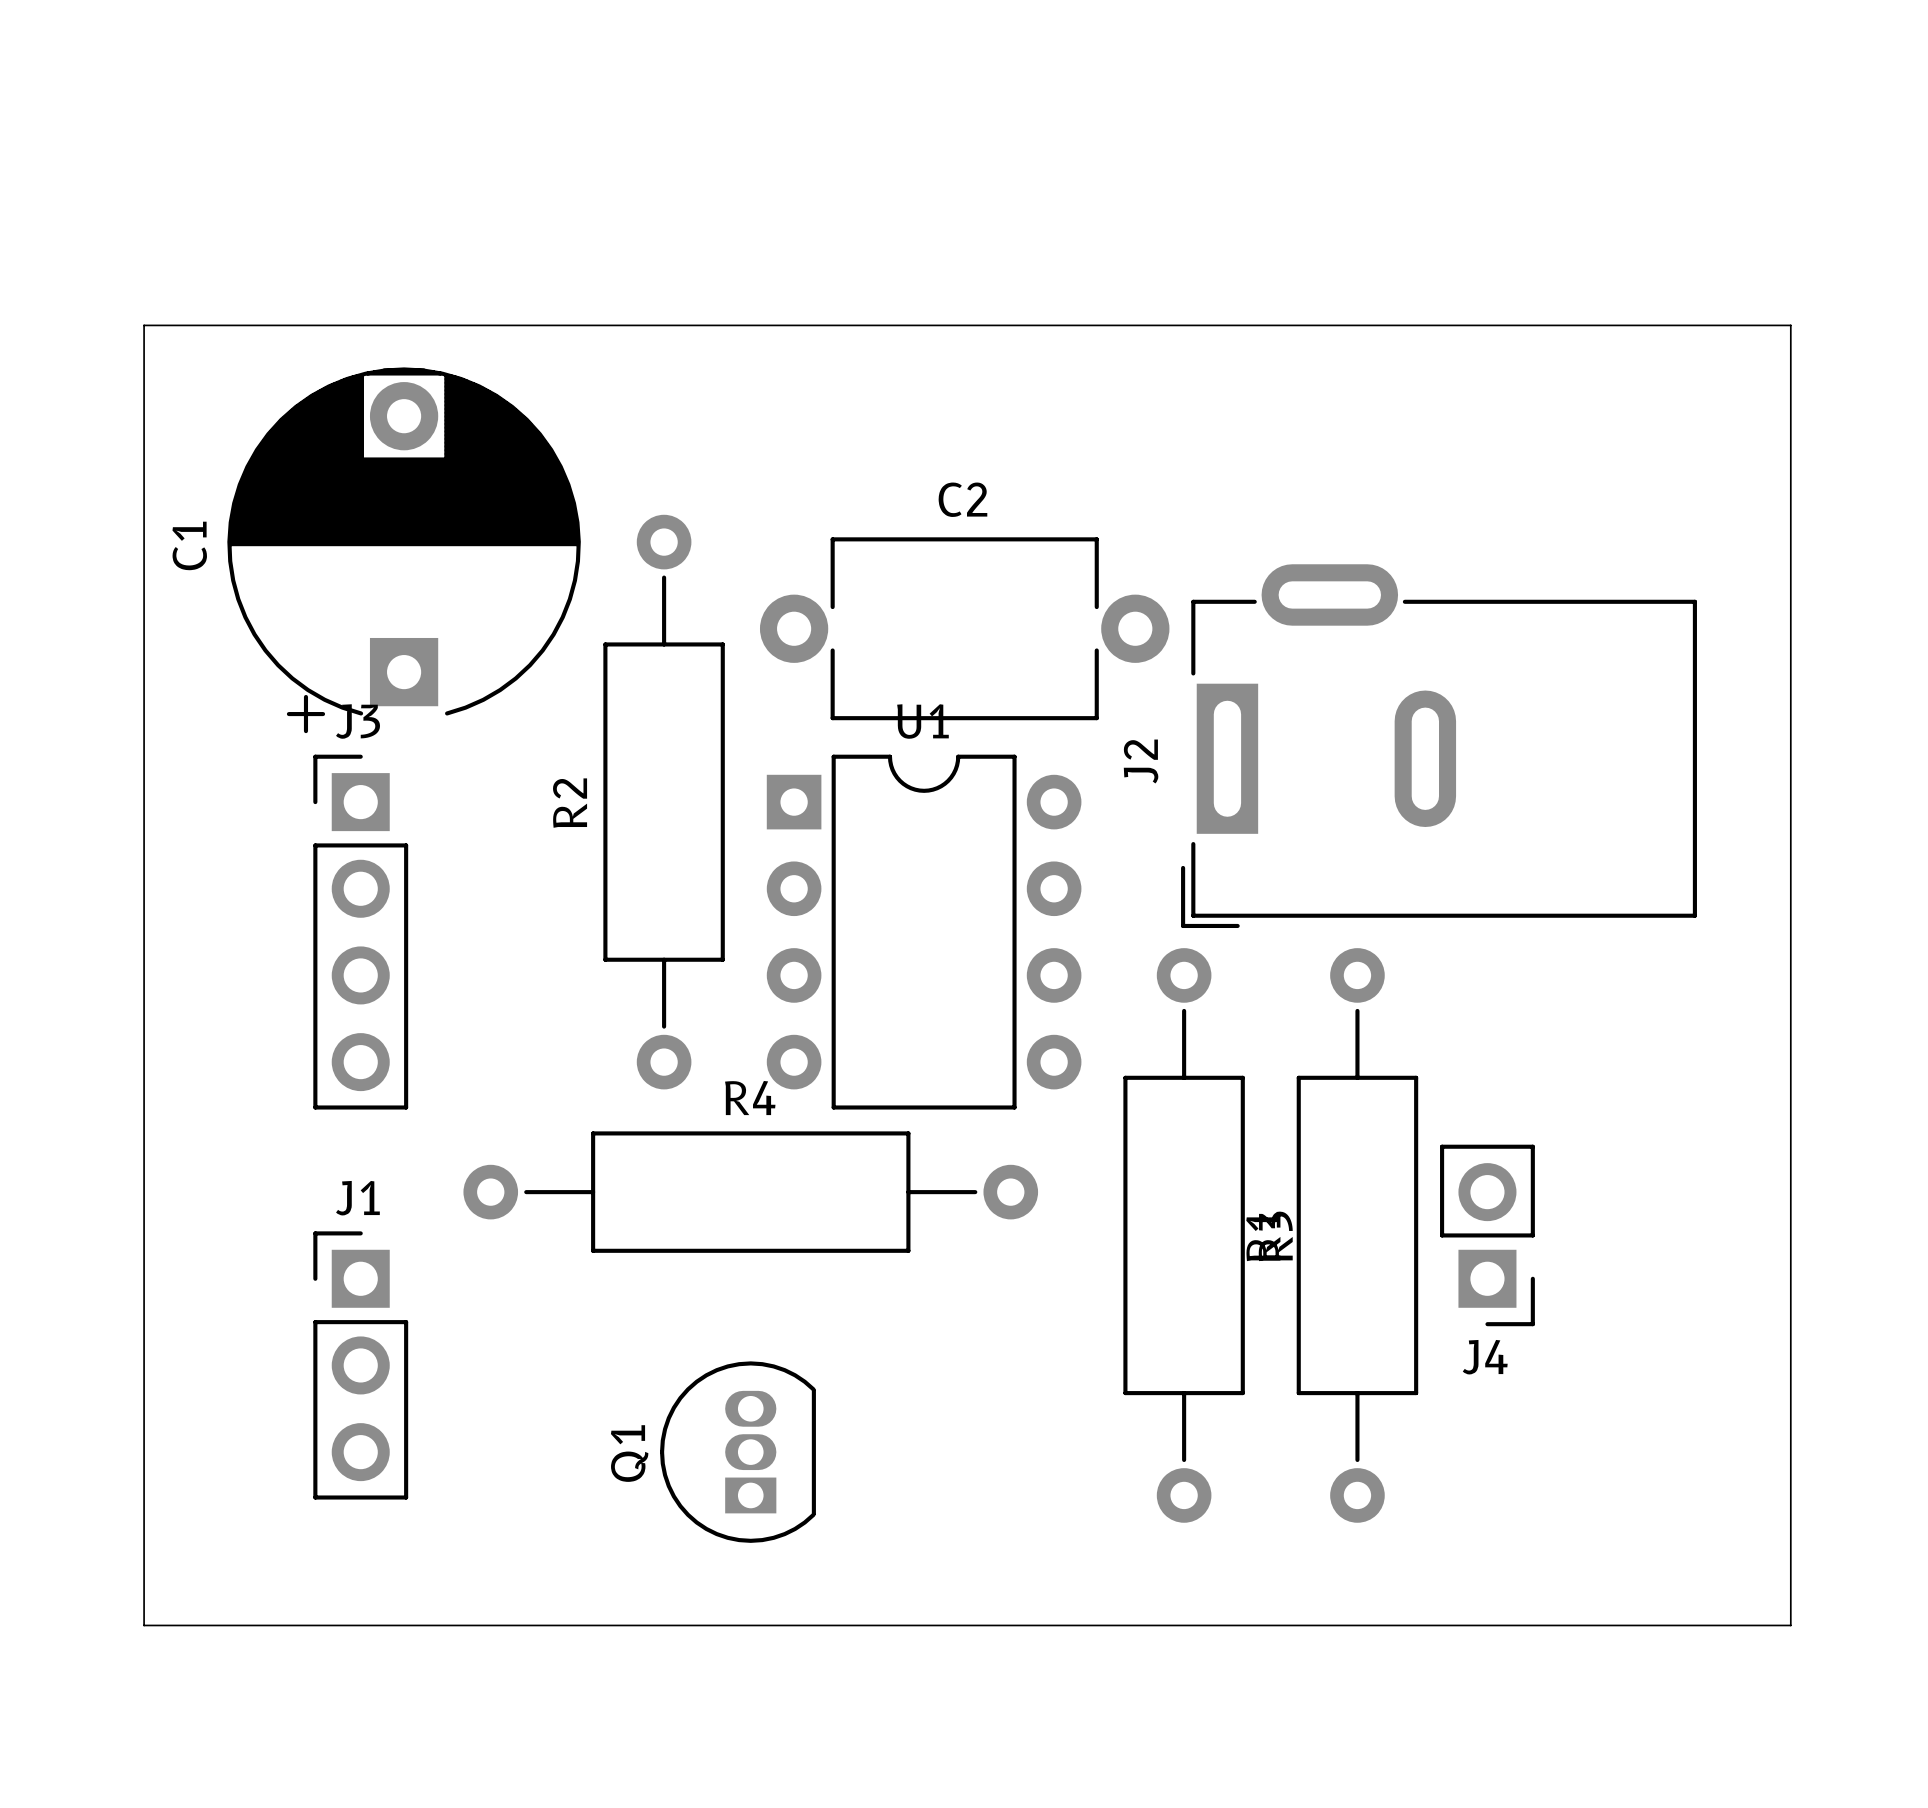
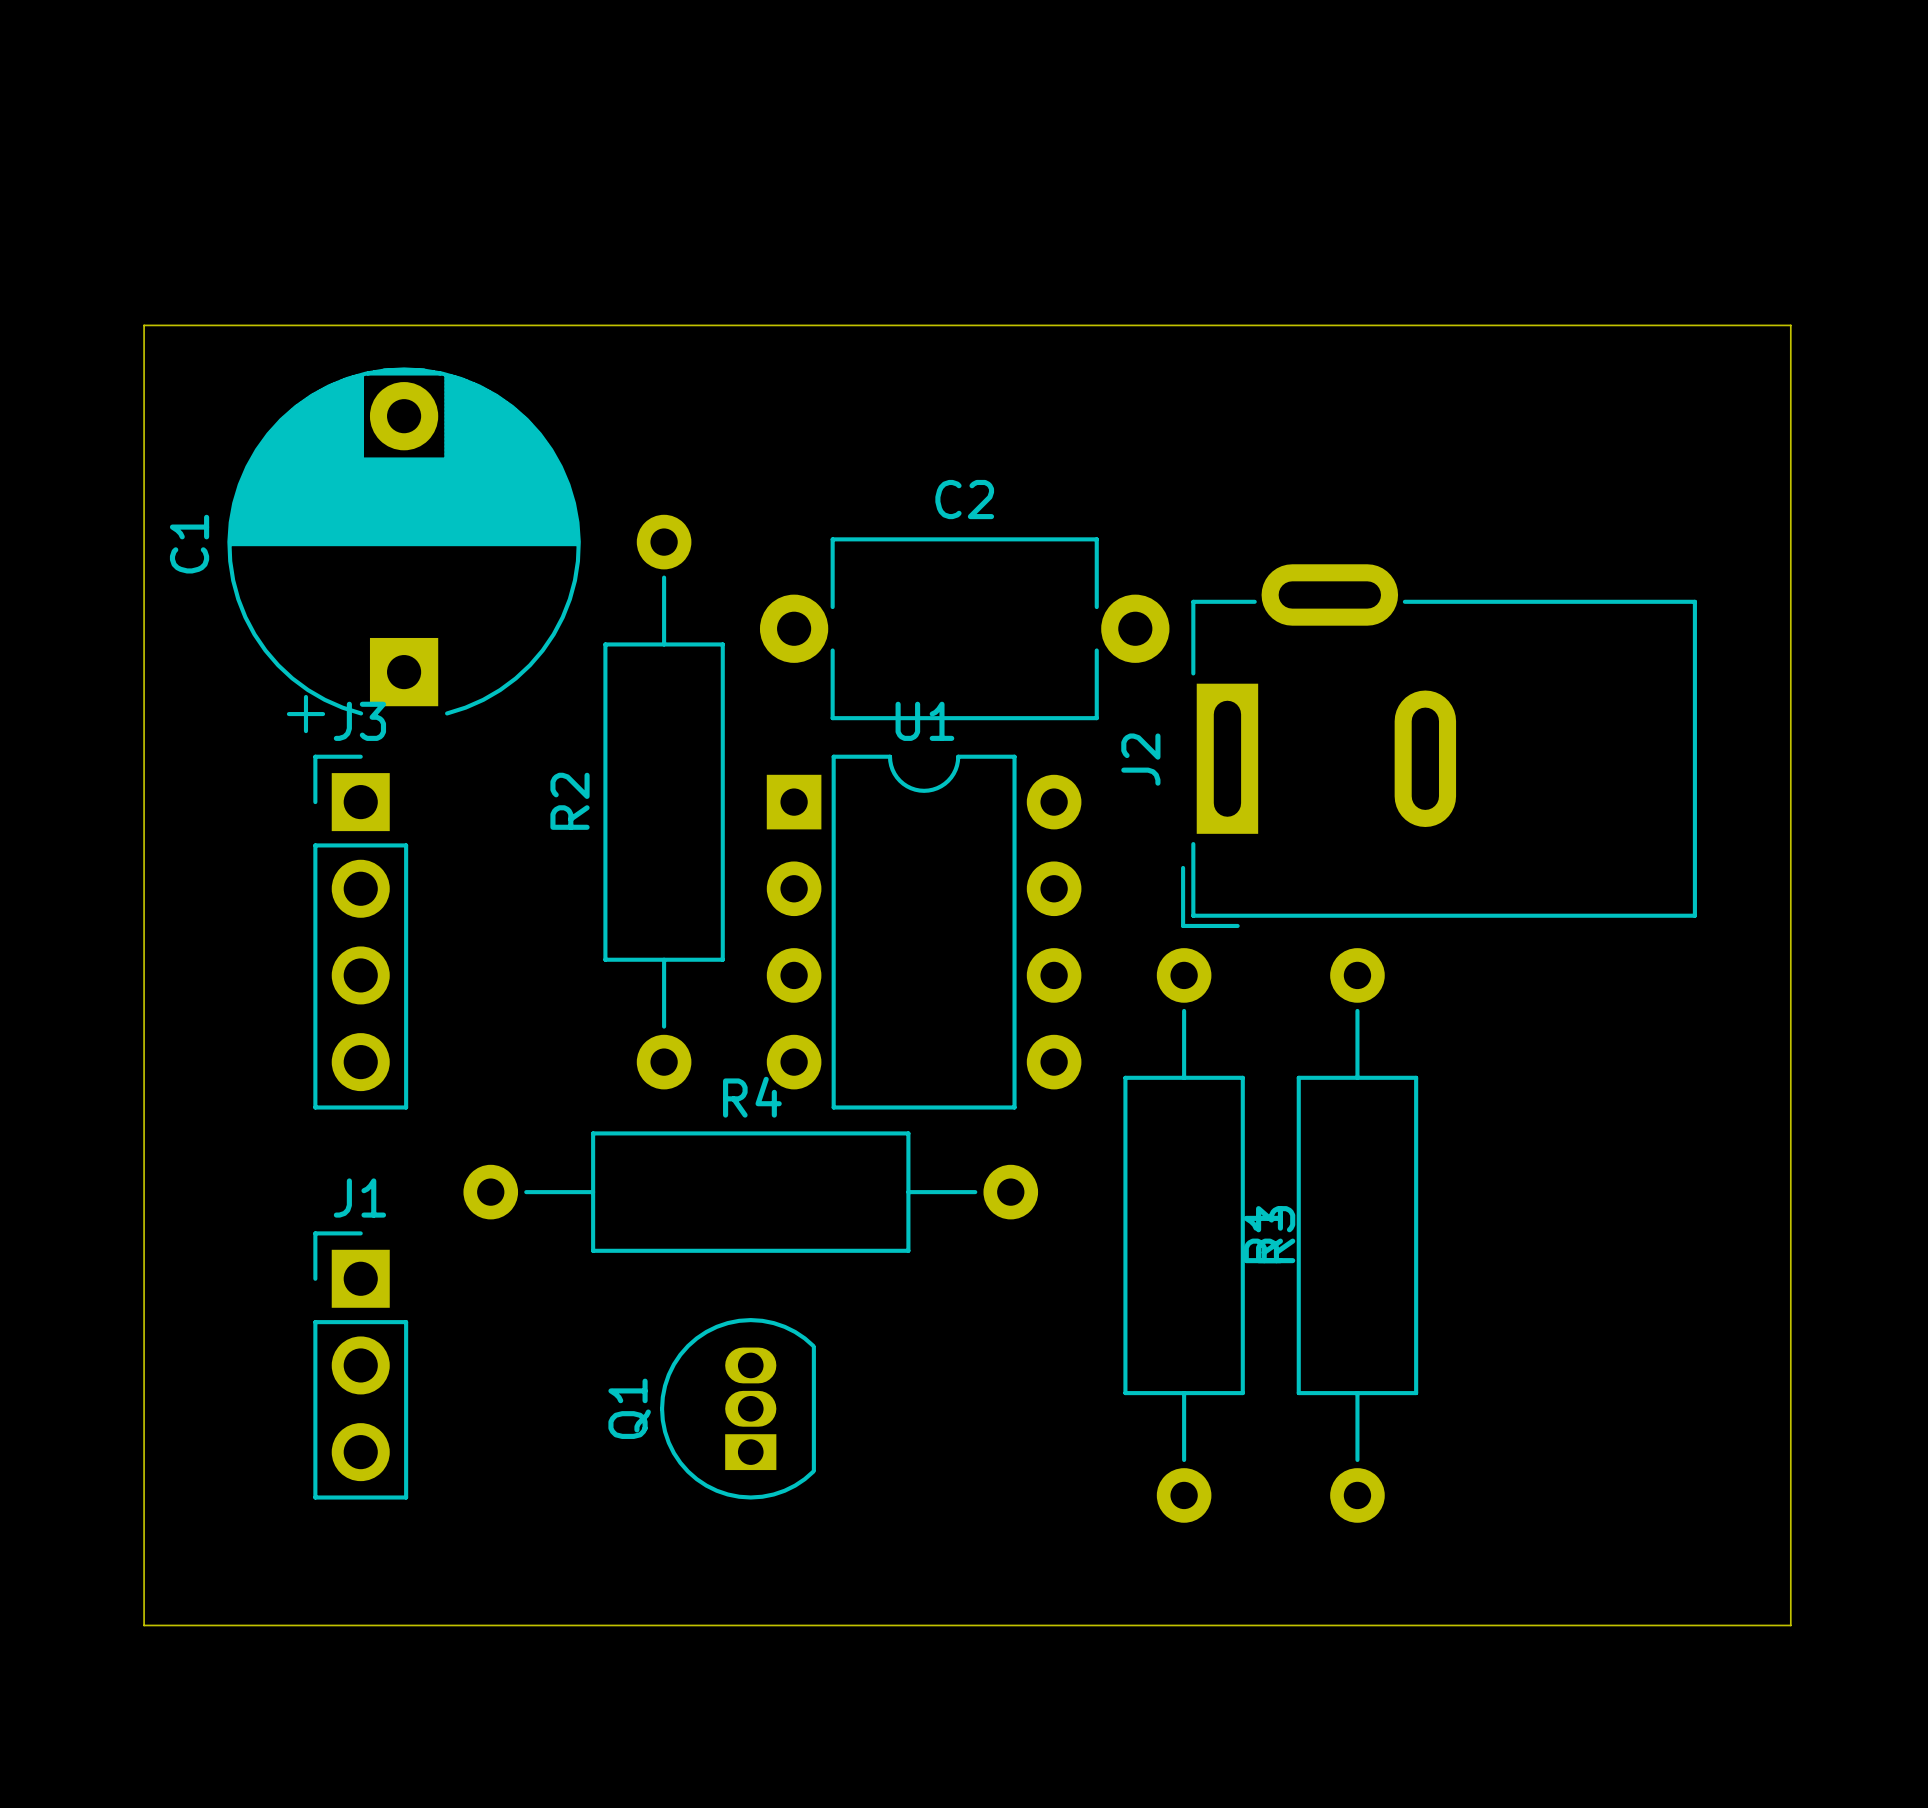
J4: (1487, 1235) -> none
Q1 position: (737, 1452) -> (737, 1408)

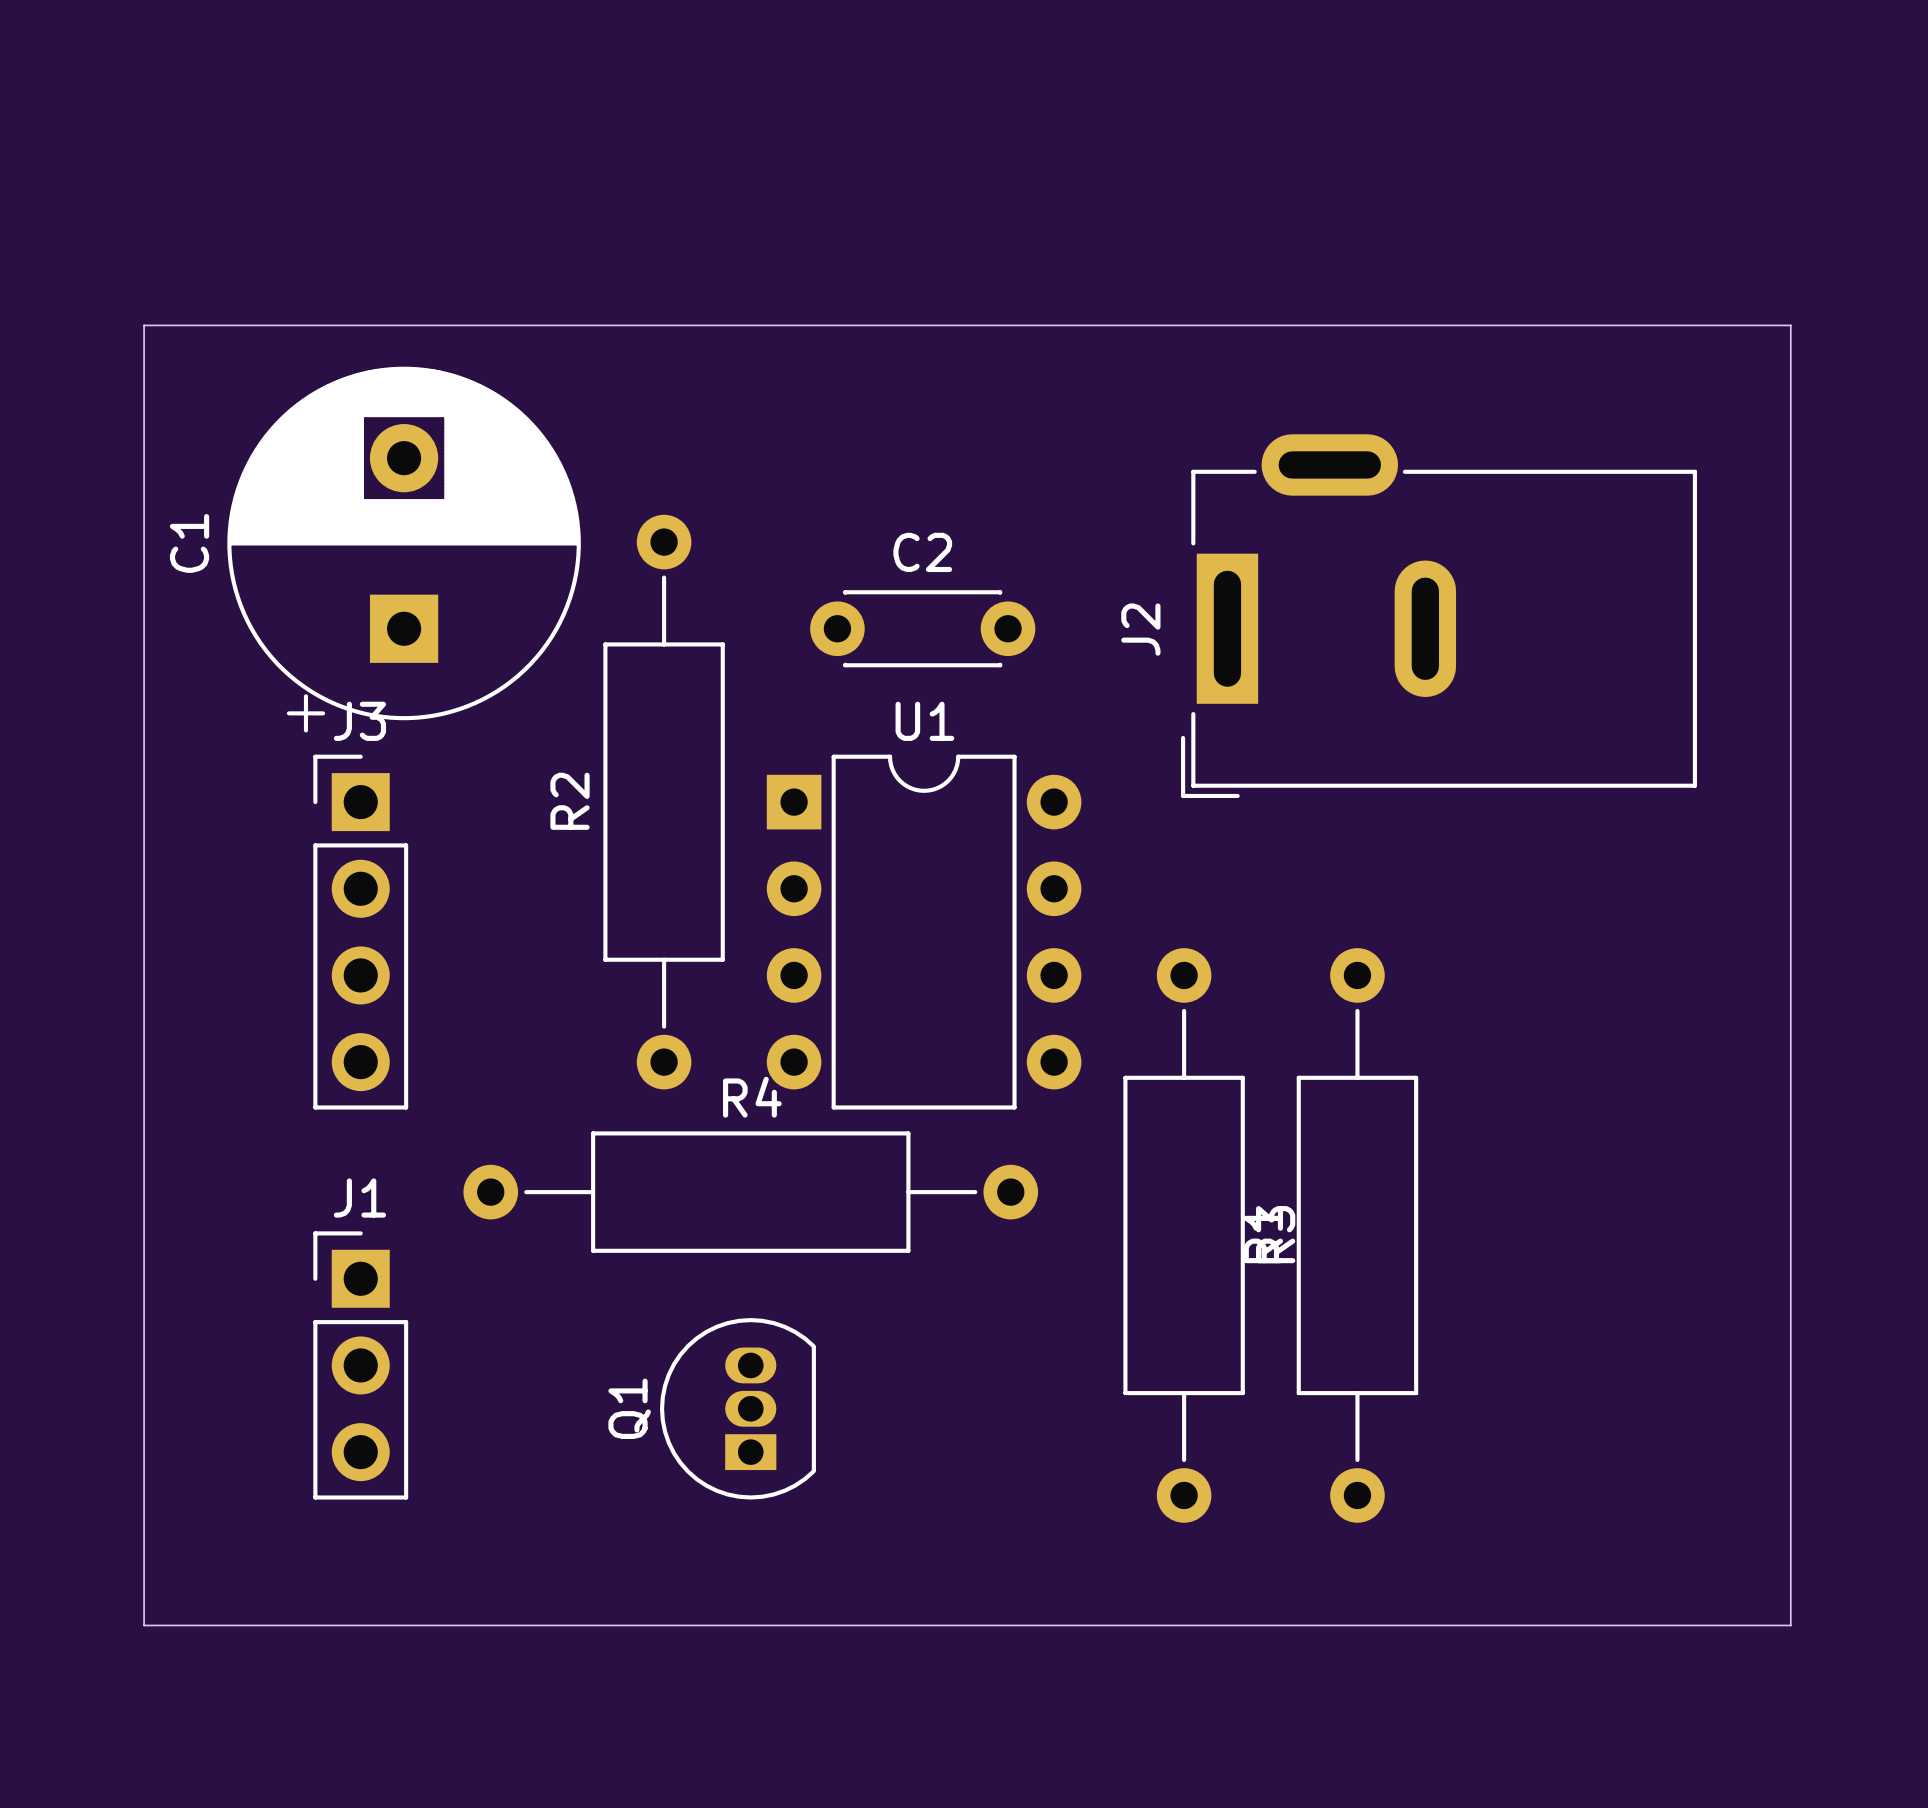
C1 footprint: [227, 367, 581, 734] -> [227, 366, 581, 733]
C2 footprint: [759, 537, 1170, 721] -> [810, 590, 1036, 668]
J2 position: (1439, 746) -> (1439, 616)

